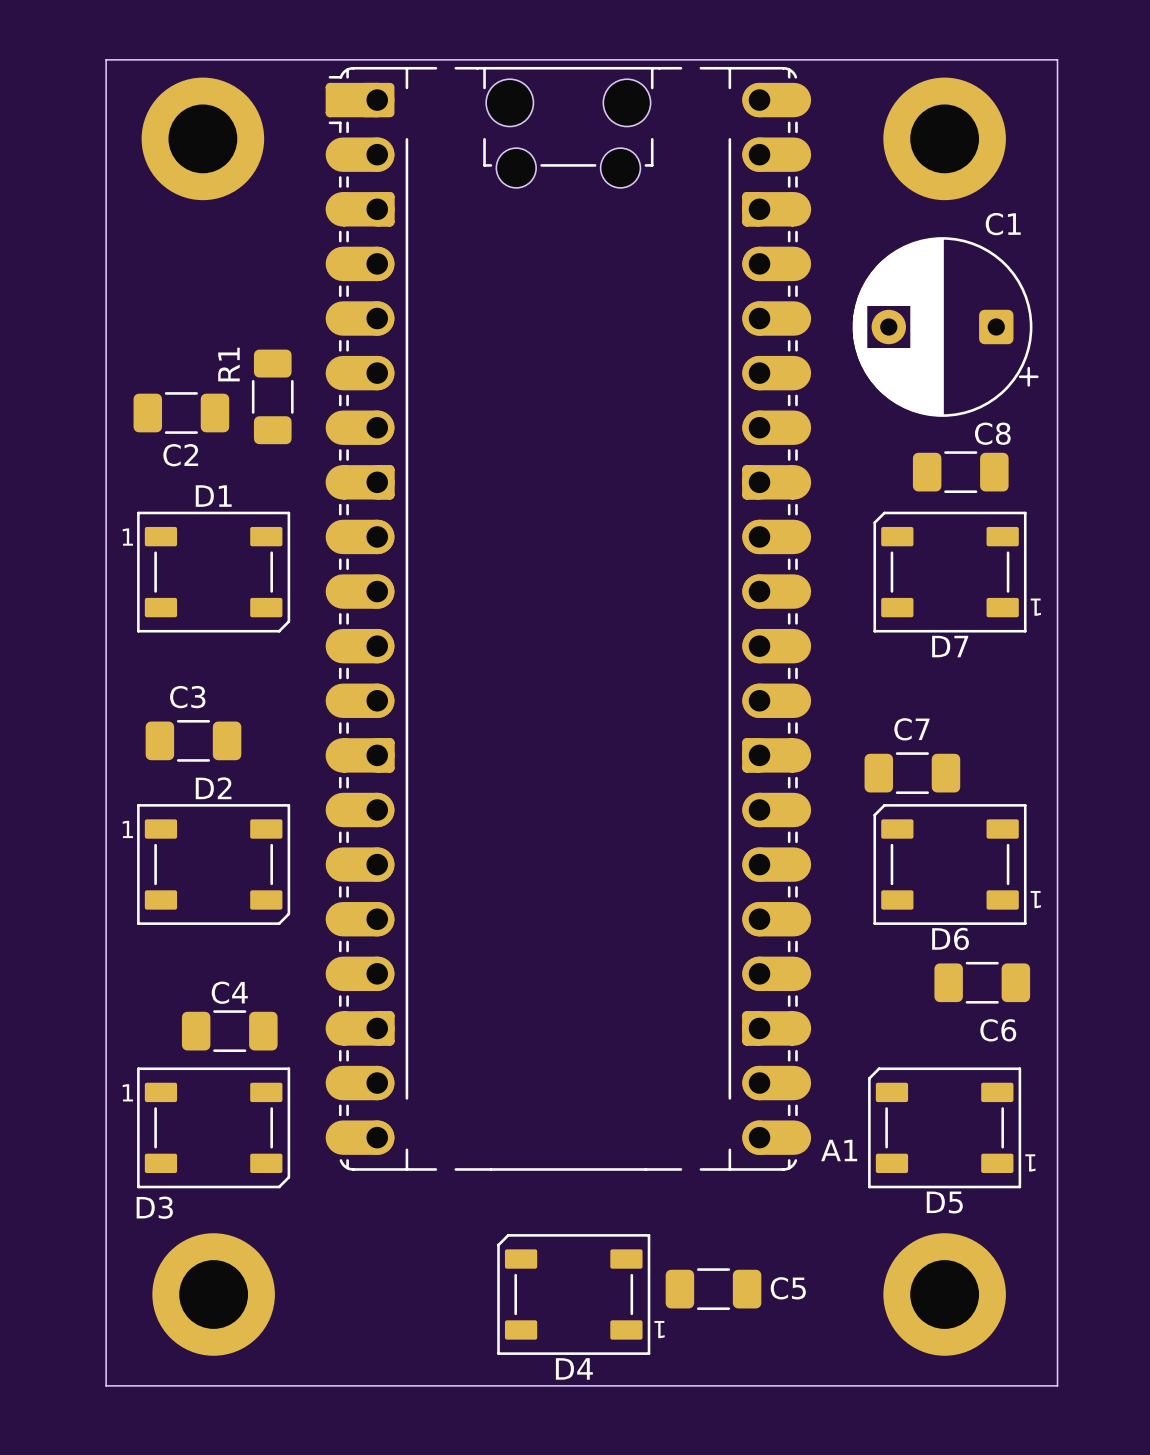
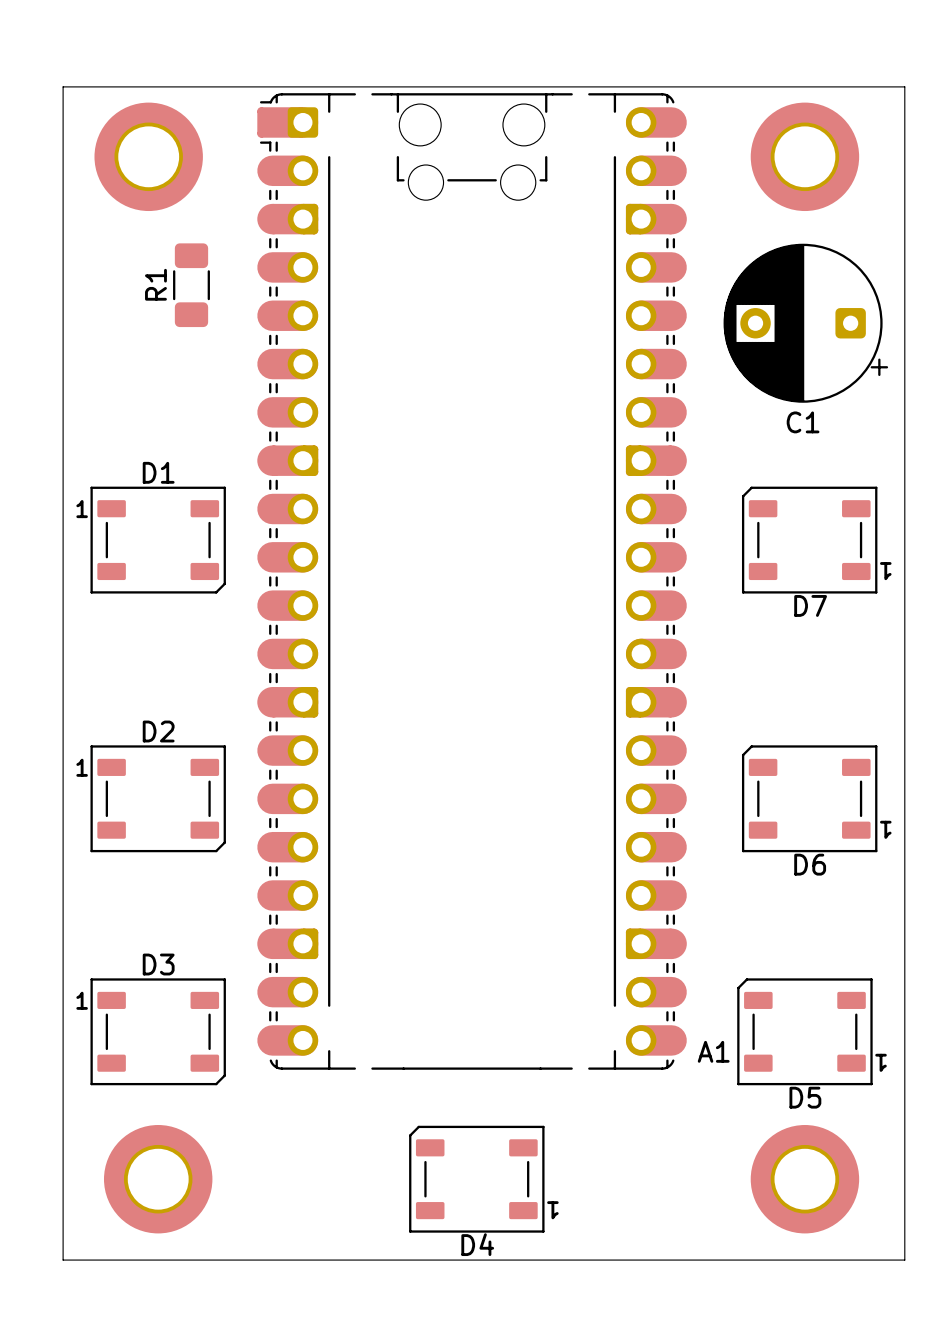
C1 name position: C1 (1003, 224) -> C1 (803, 422)
R1 name position: R1 (228, 364) -> R1 (155, 284)
R1 position: (272, 396) -> (191, 285)
C2: (181, 413) -> none
C8: (960, 472) -> none
C3: (193, 740) -> none
C7: (912, 773) -> none
C6: (982, 982) -> none
C4: (229, 1031) -> none
D3 name position: D3 (154, 1207) -> D3 (158, 964)
C5: (713, 1289) -> none

